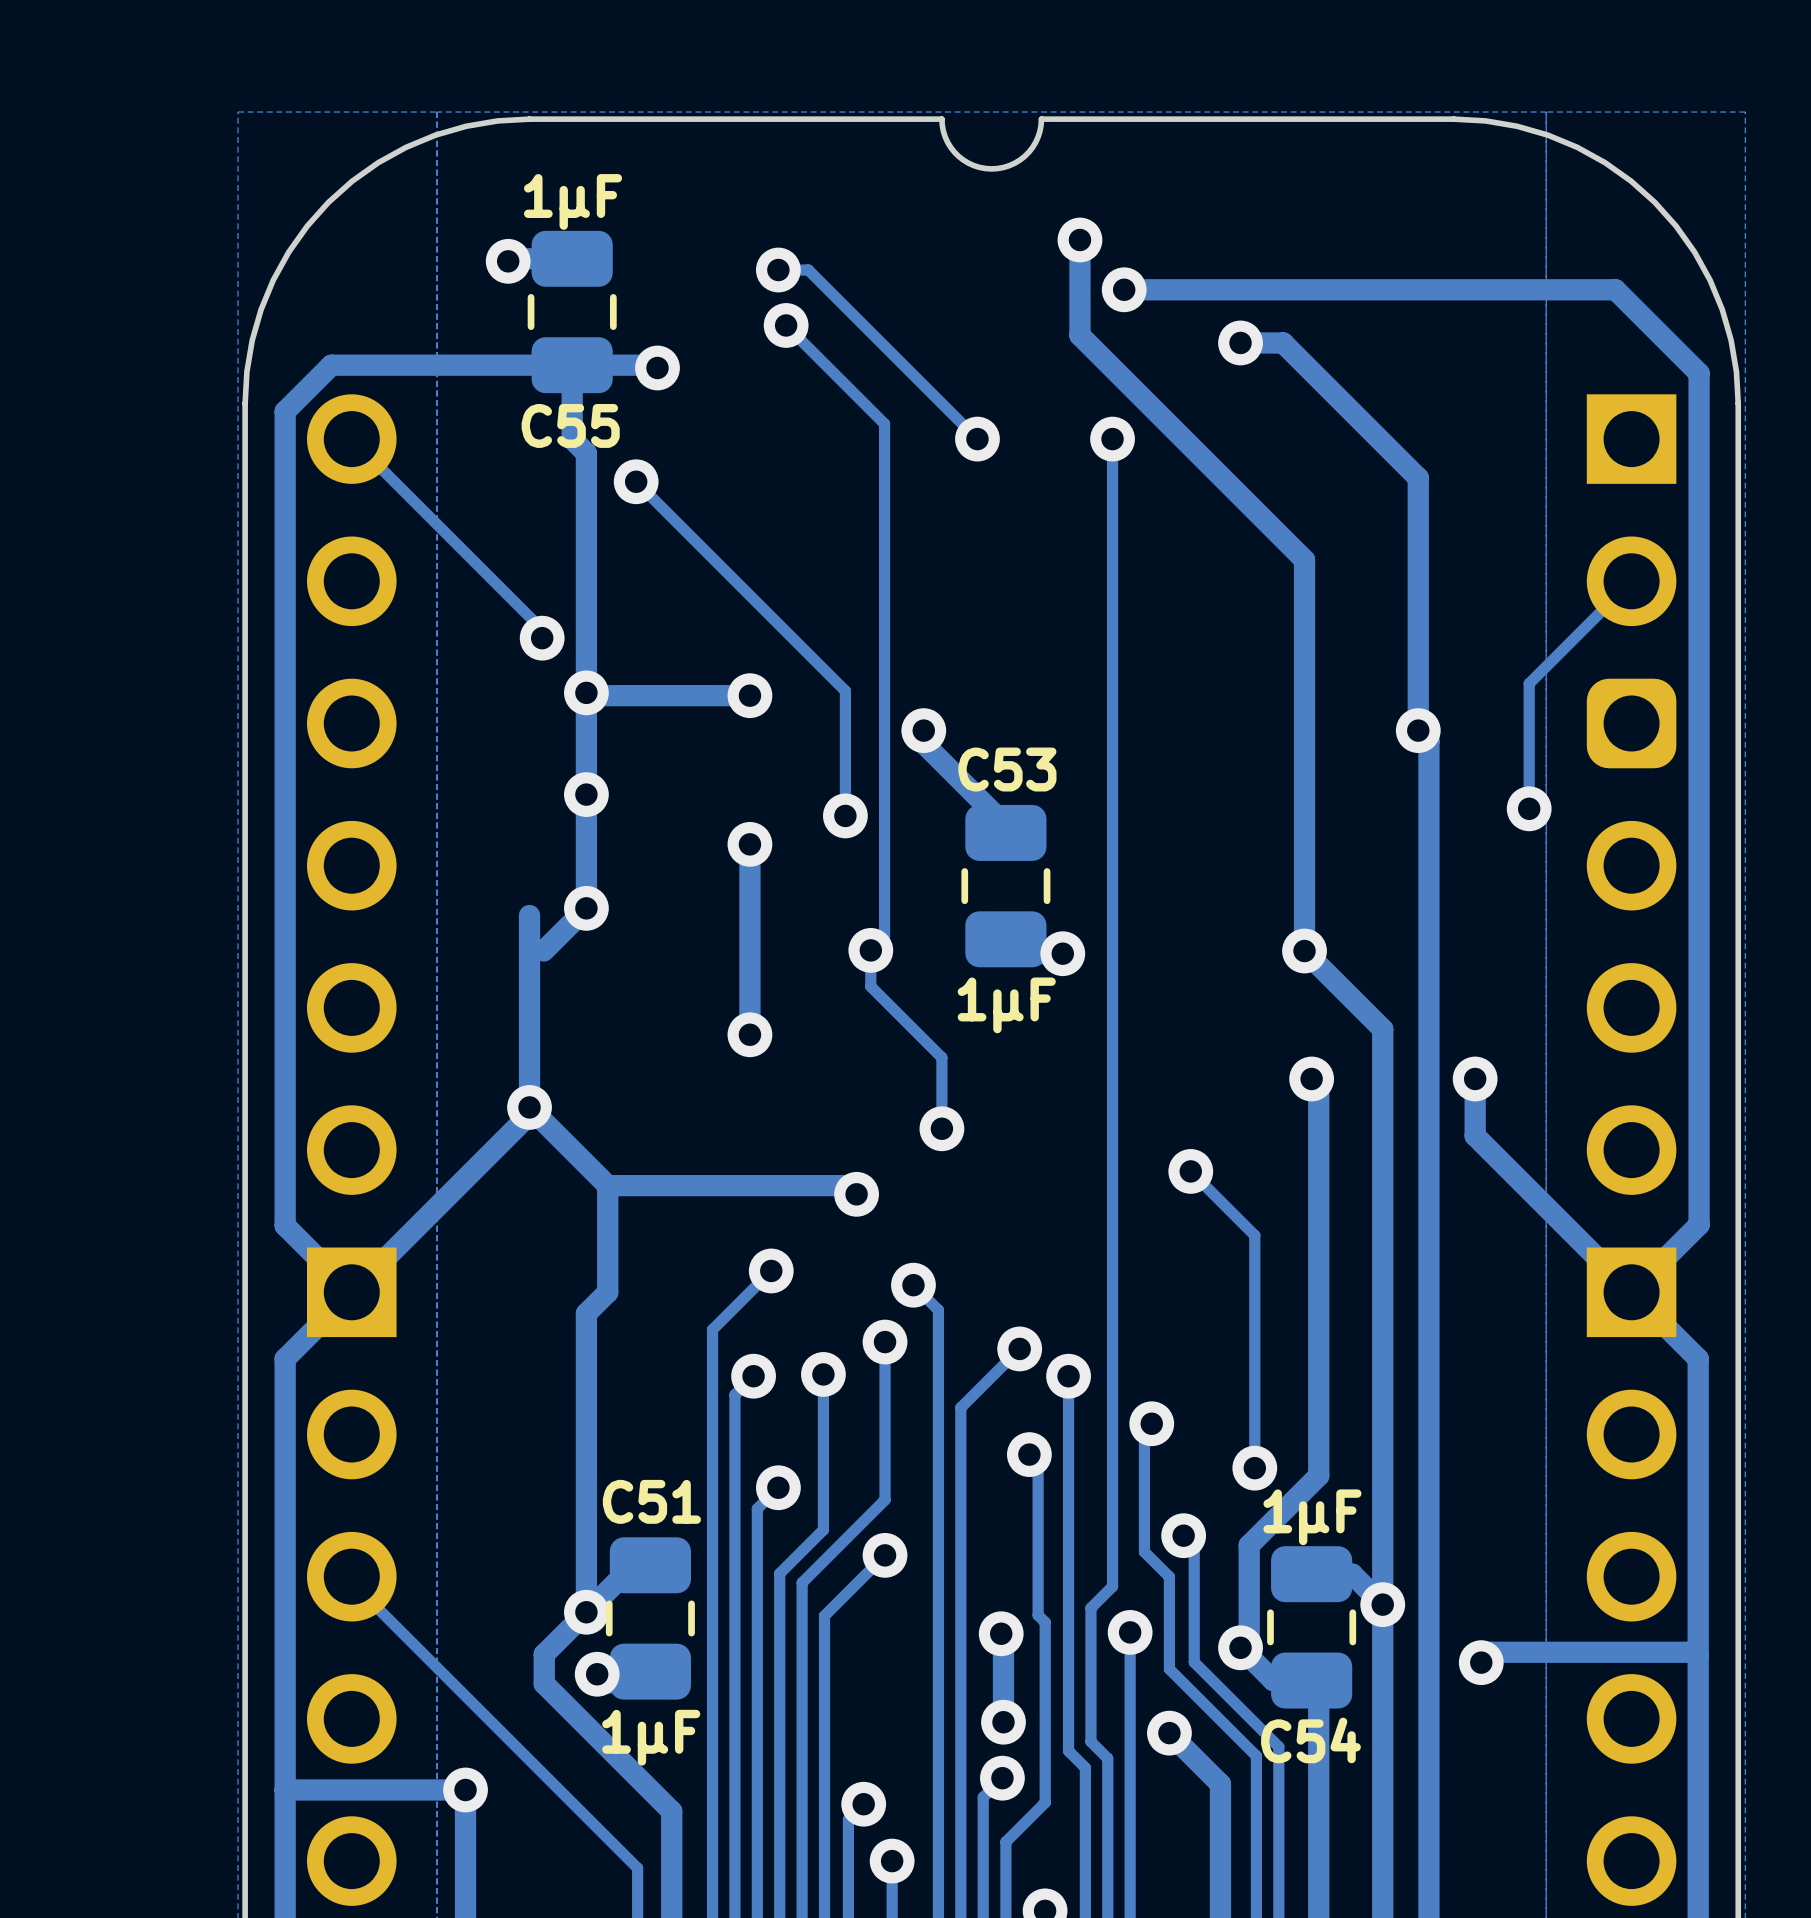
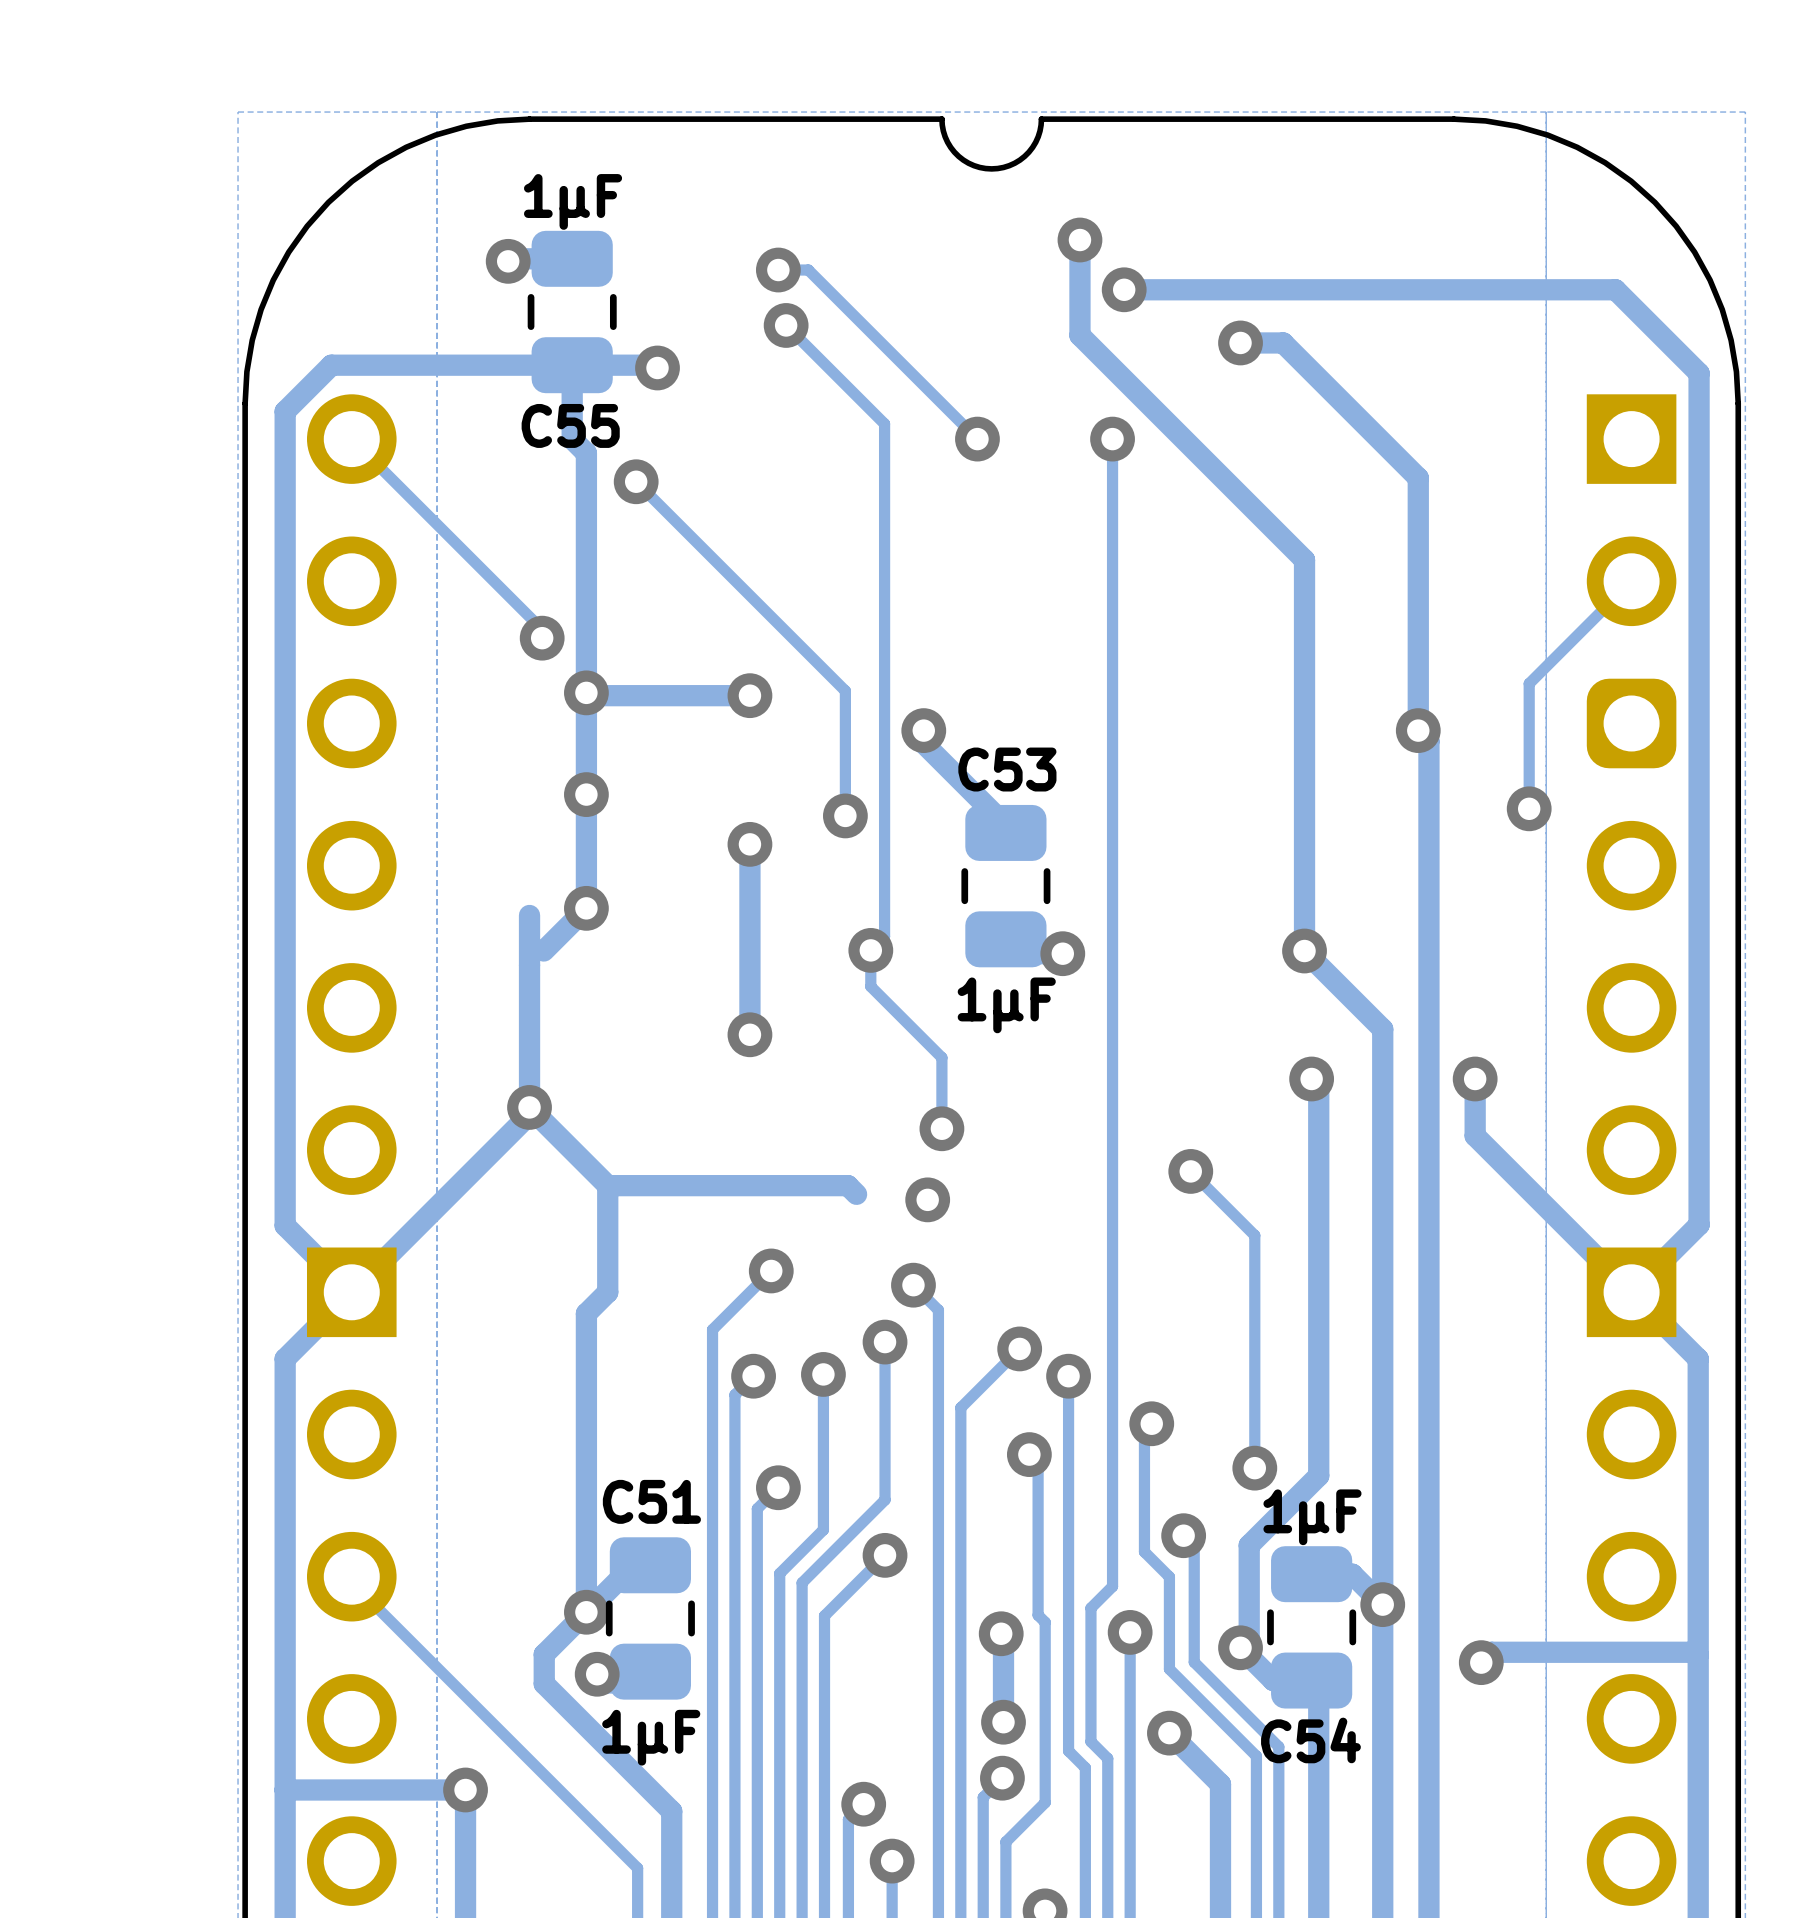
via position: (856, 1194) -> (927, 1199)

